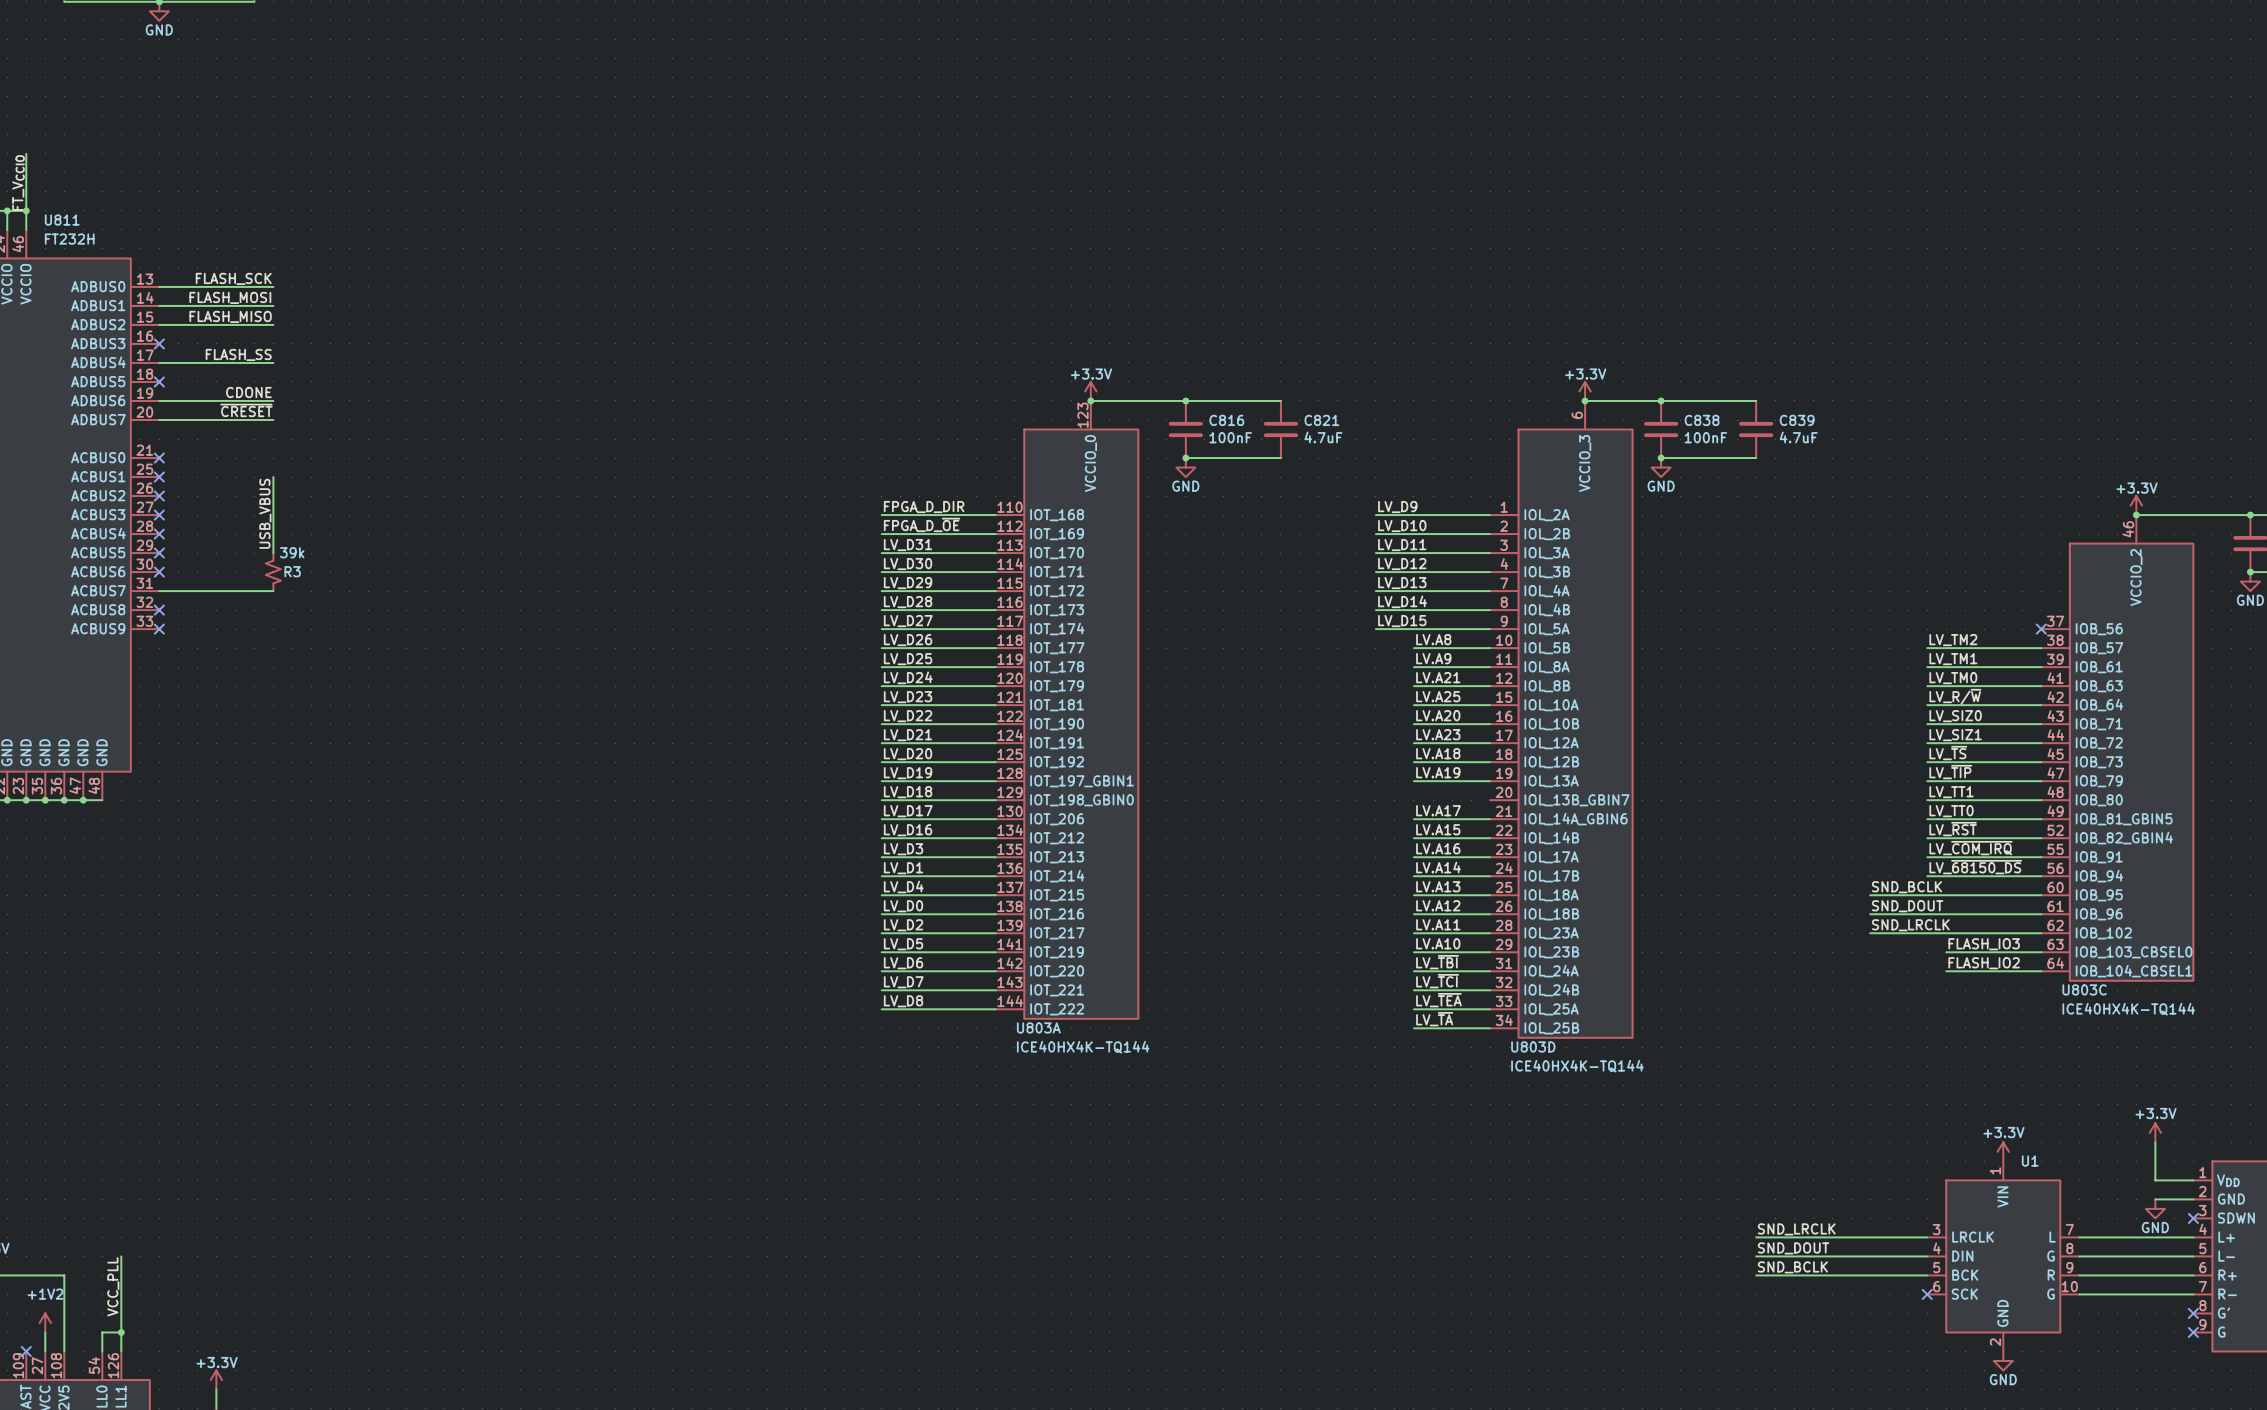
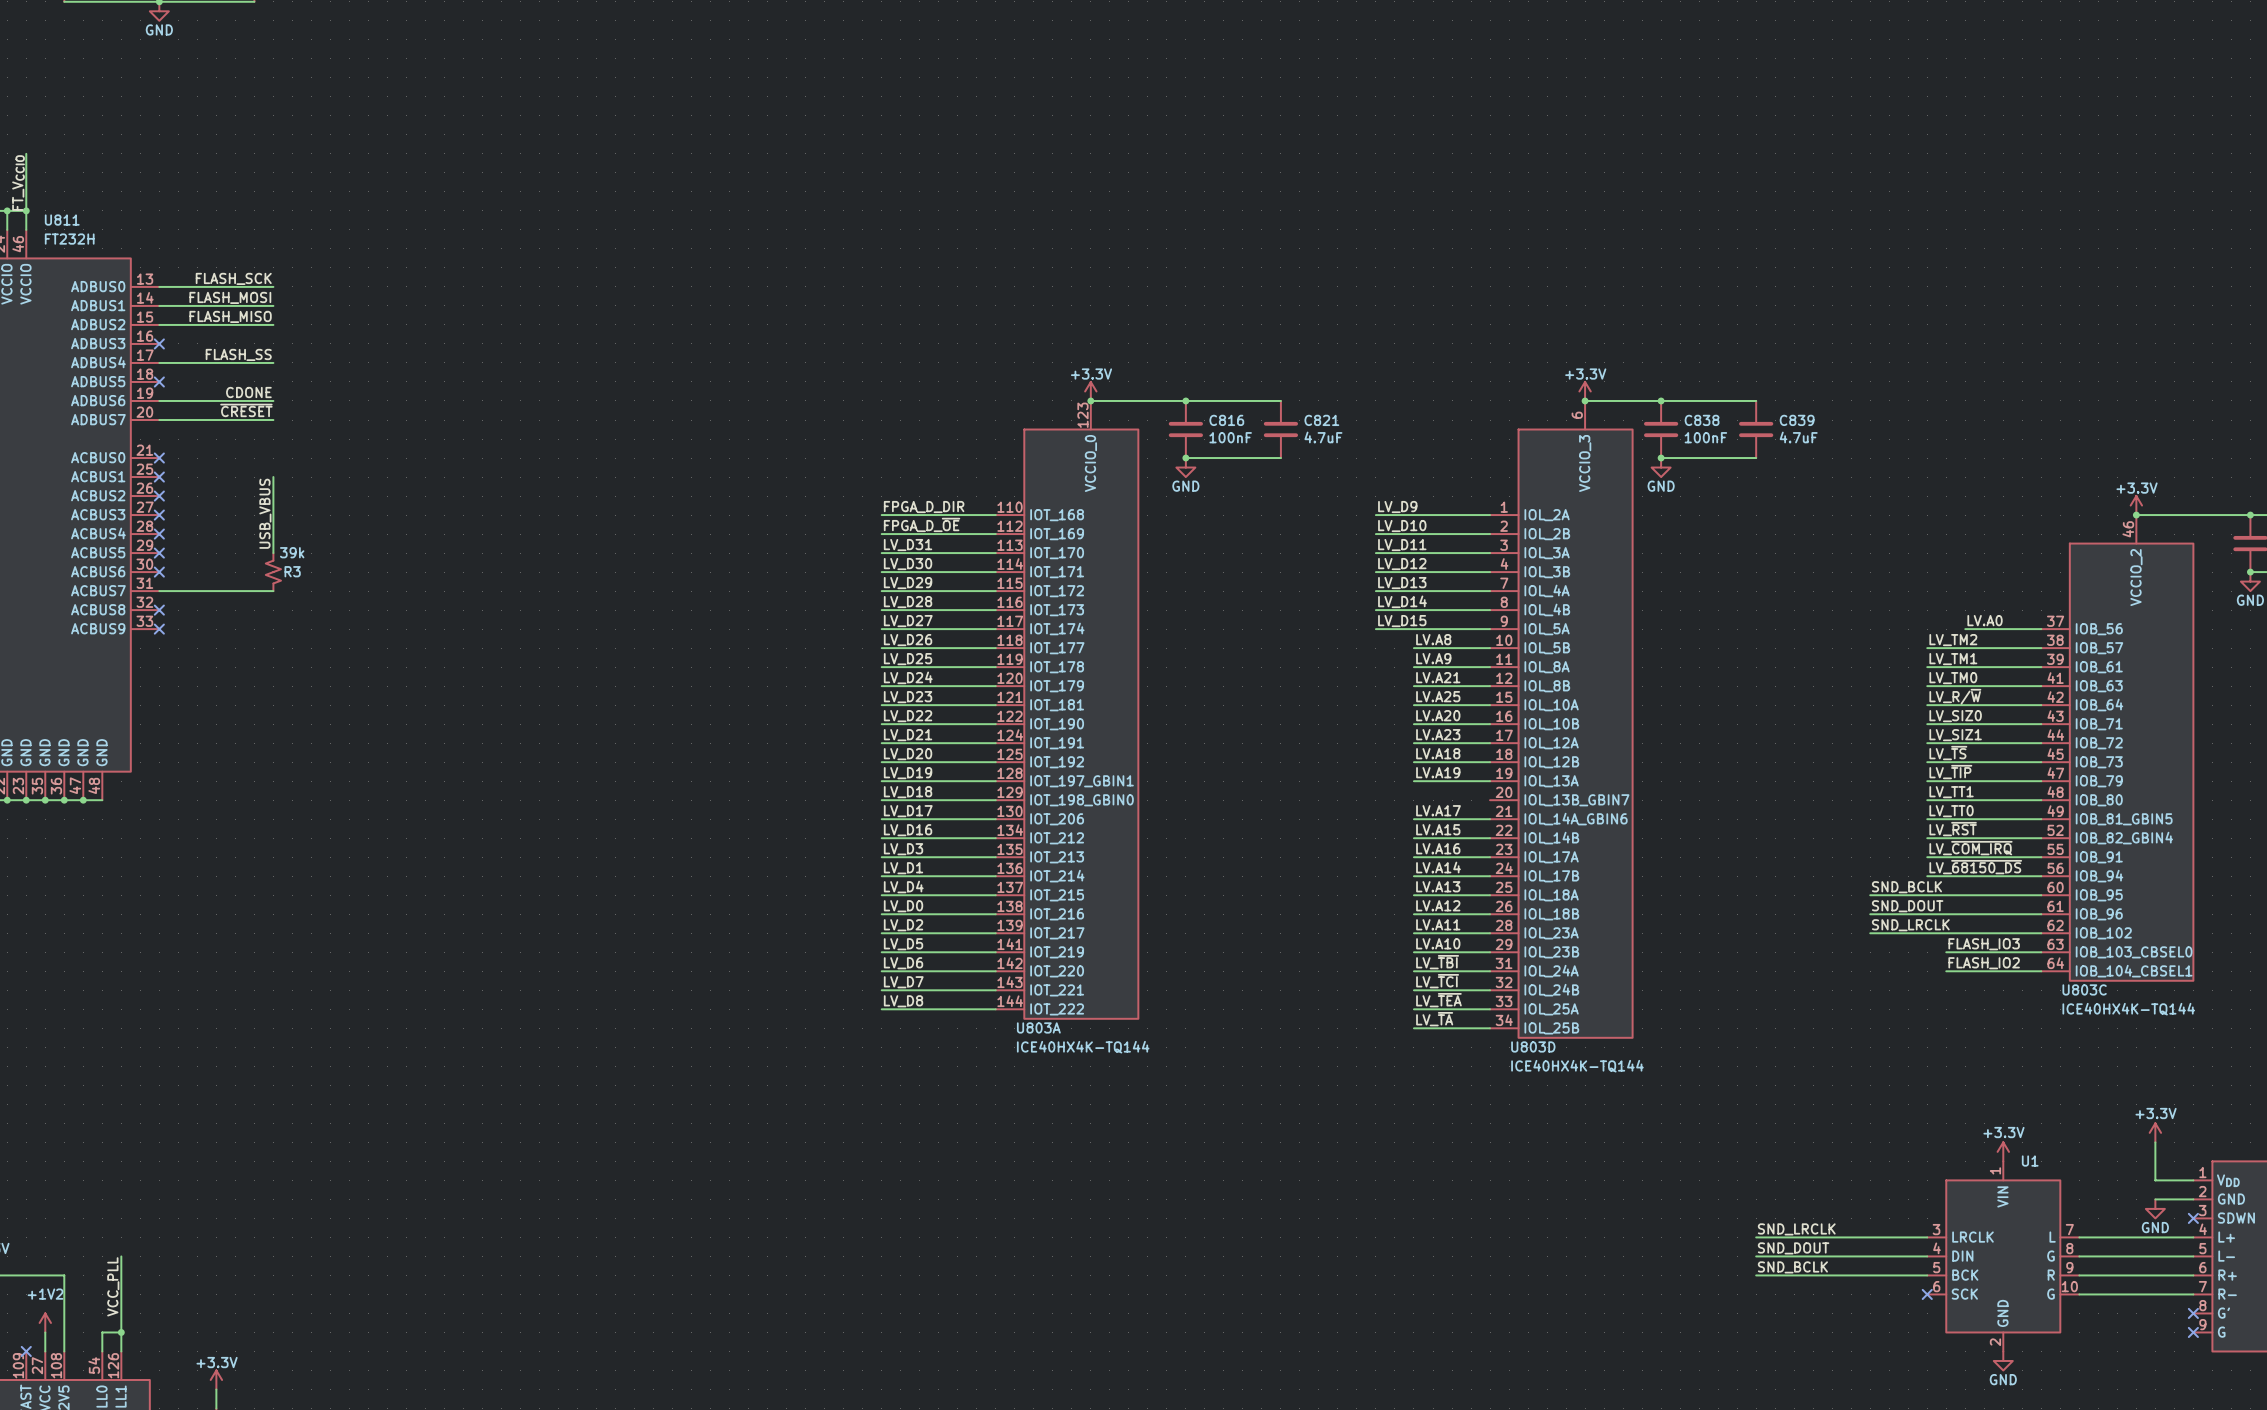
label: none -> LV.A0 (1985, 620)
wire: none -> (1965, 629) (2041, 629)
no-connect mark: (2041, 629) -> none

